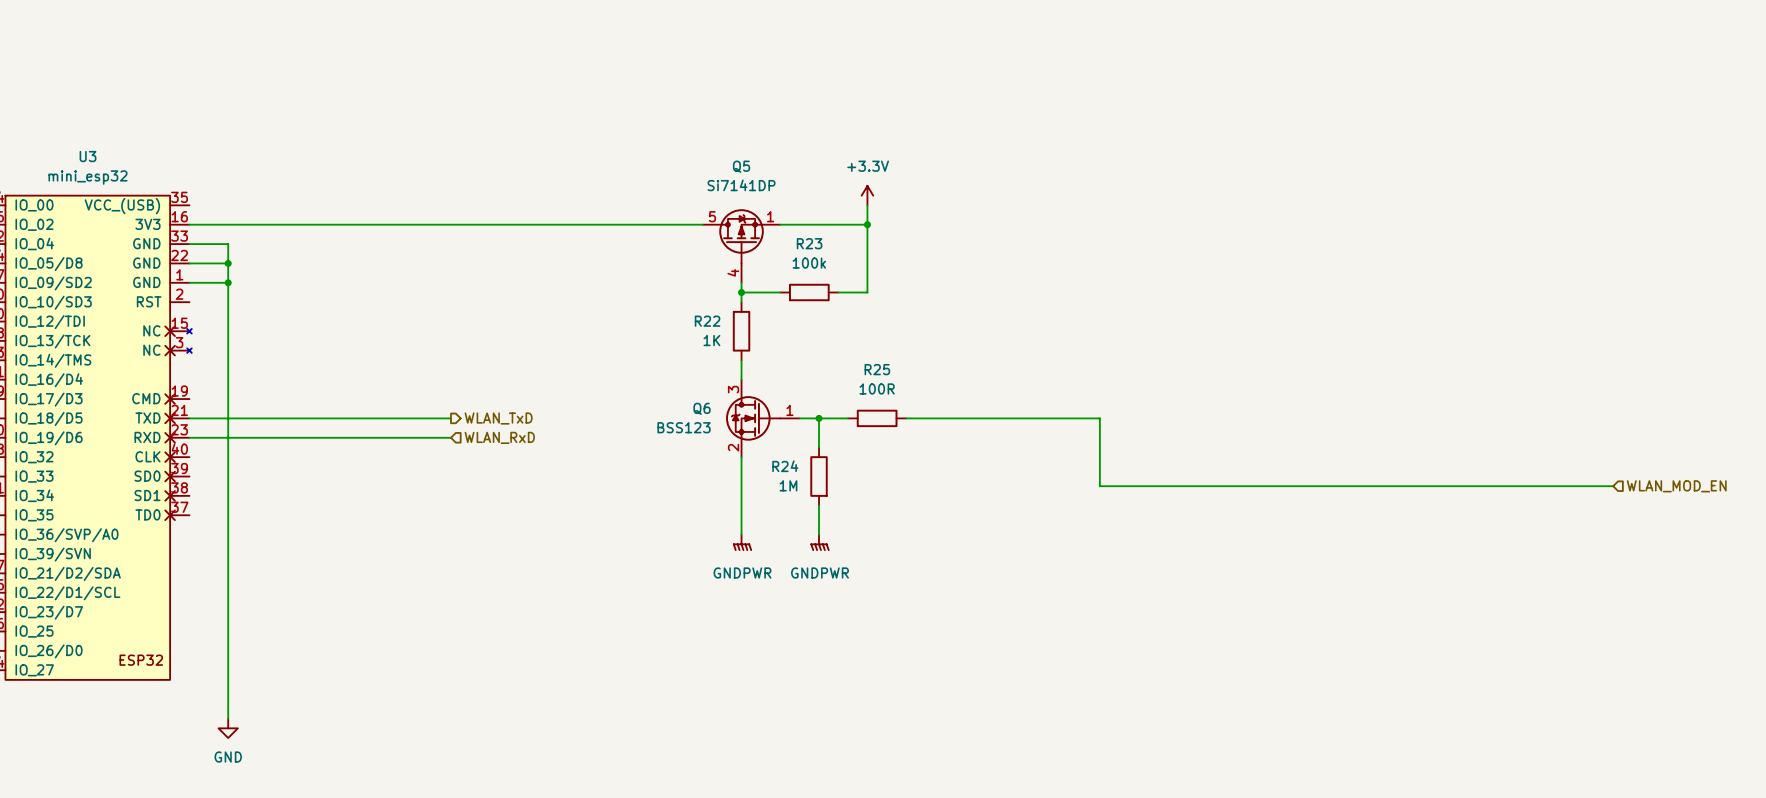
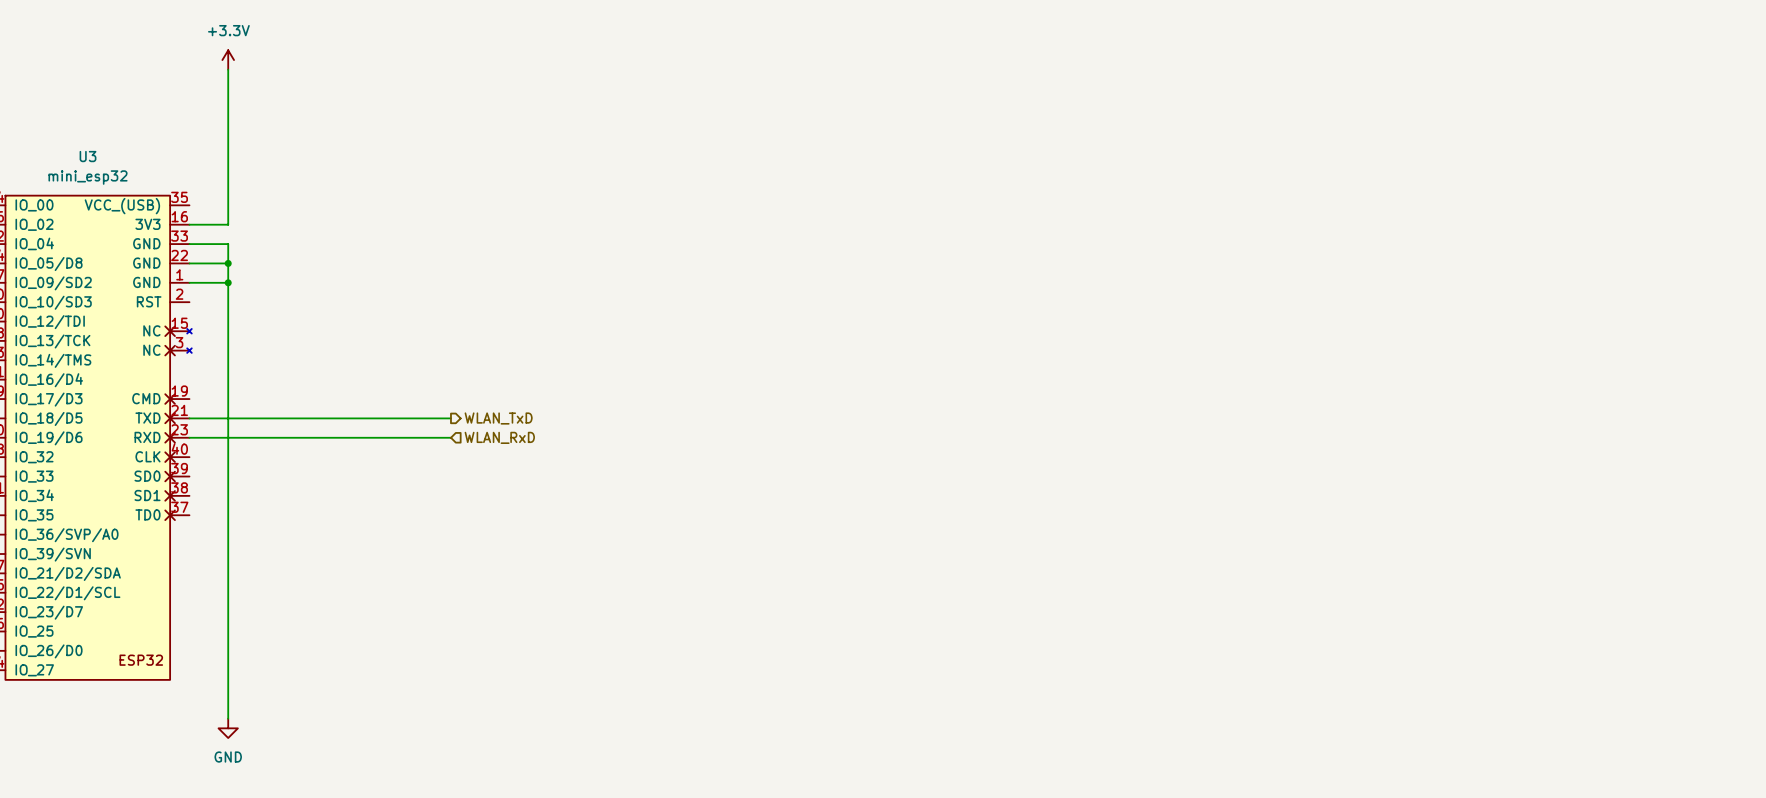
power symbol: none -> +3.3V (228, 60)
power symbol: +3.3V (867, 195) -> none
wire: (867, 205) (867, 292) (838, 292) -> none
wire: (228, 224) (702, 224) -> (228, 224) (228, 69)
wire: (780, 224) (867, 224) -> none
junction: (867, 224) -> none
Q5: Si7141DP (741, 246) -> none
wire: (741, 282) (741, 302) -> none
wire: (741, 292) (780, 292) -> none
junction: (741, 292) -> none
R23: 100k (809, 292) -> none
R22: 1K (741, 331) -> none
wire: (741, 360) (741, 379) -> none
Q6: BSS123 (762, 418) -> none
wire: (799, 418) (848, 418) -> none
wire: (819, 418) (819, 447) -> none
junction: (819, 418) -> none
R25: 100R (877, 418) -> none
wire: (906, 418) (1099, 418) (1099, 486) (1613, 486) -> none
wire: (741, 457) (741, 534) -> none
R24: 1M (819, 476) -> none
hierarchical label: WLAN_MOD_EN (1676, 486) -> none
wire: (819, 505) (819, 534) -> none
power symbol: GNDPWR (742, 542) -> none
power symbol: GNDPWR (819, 542) -> none

